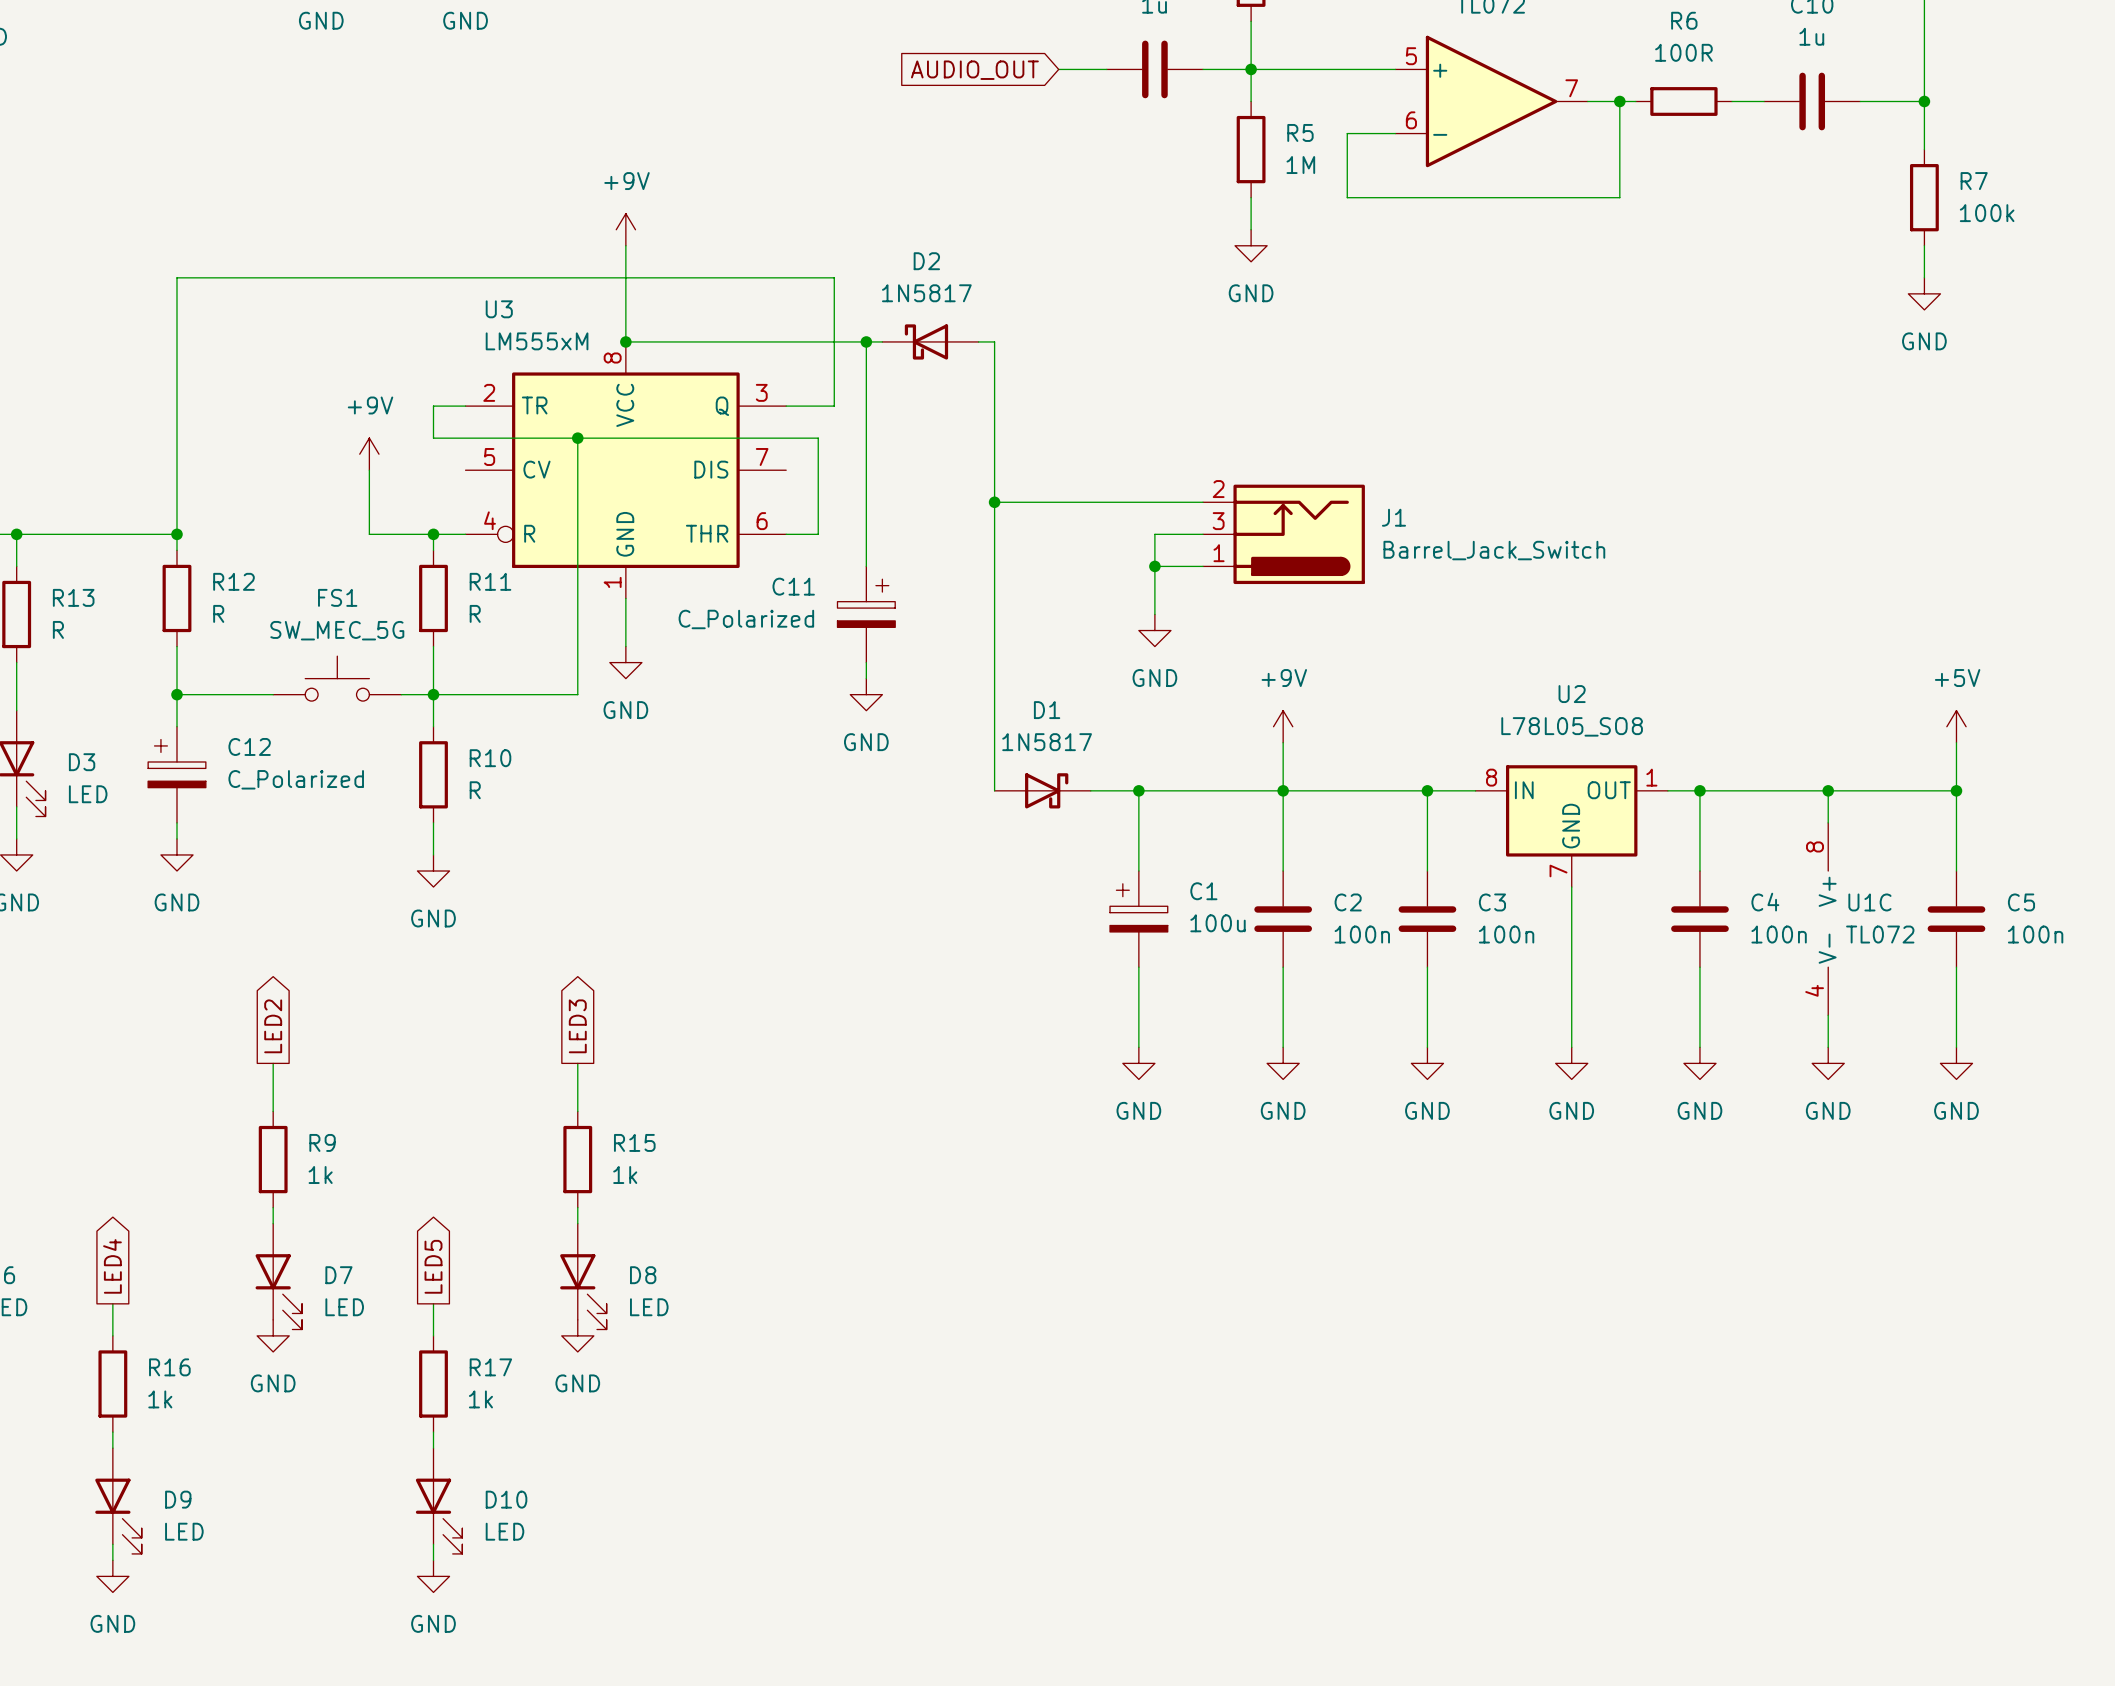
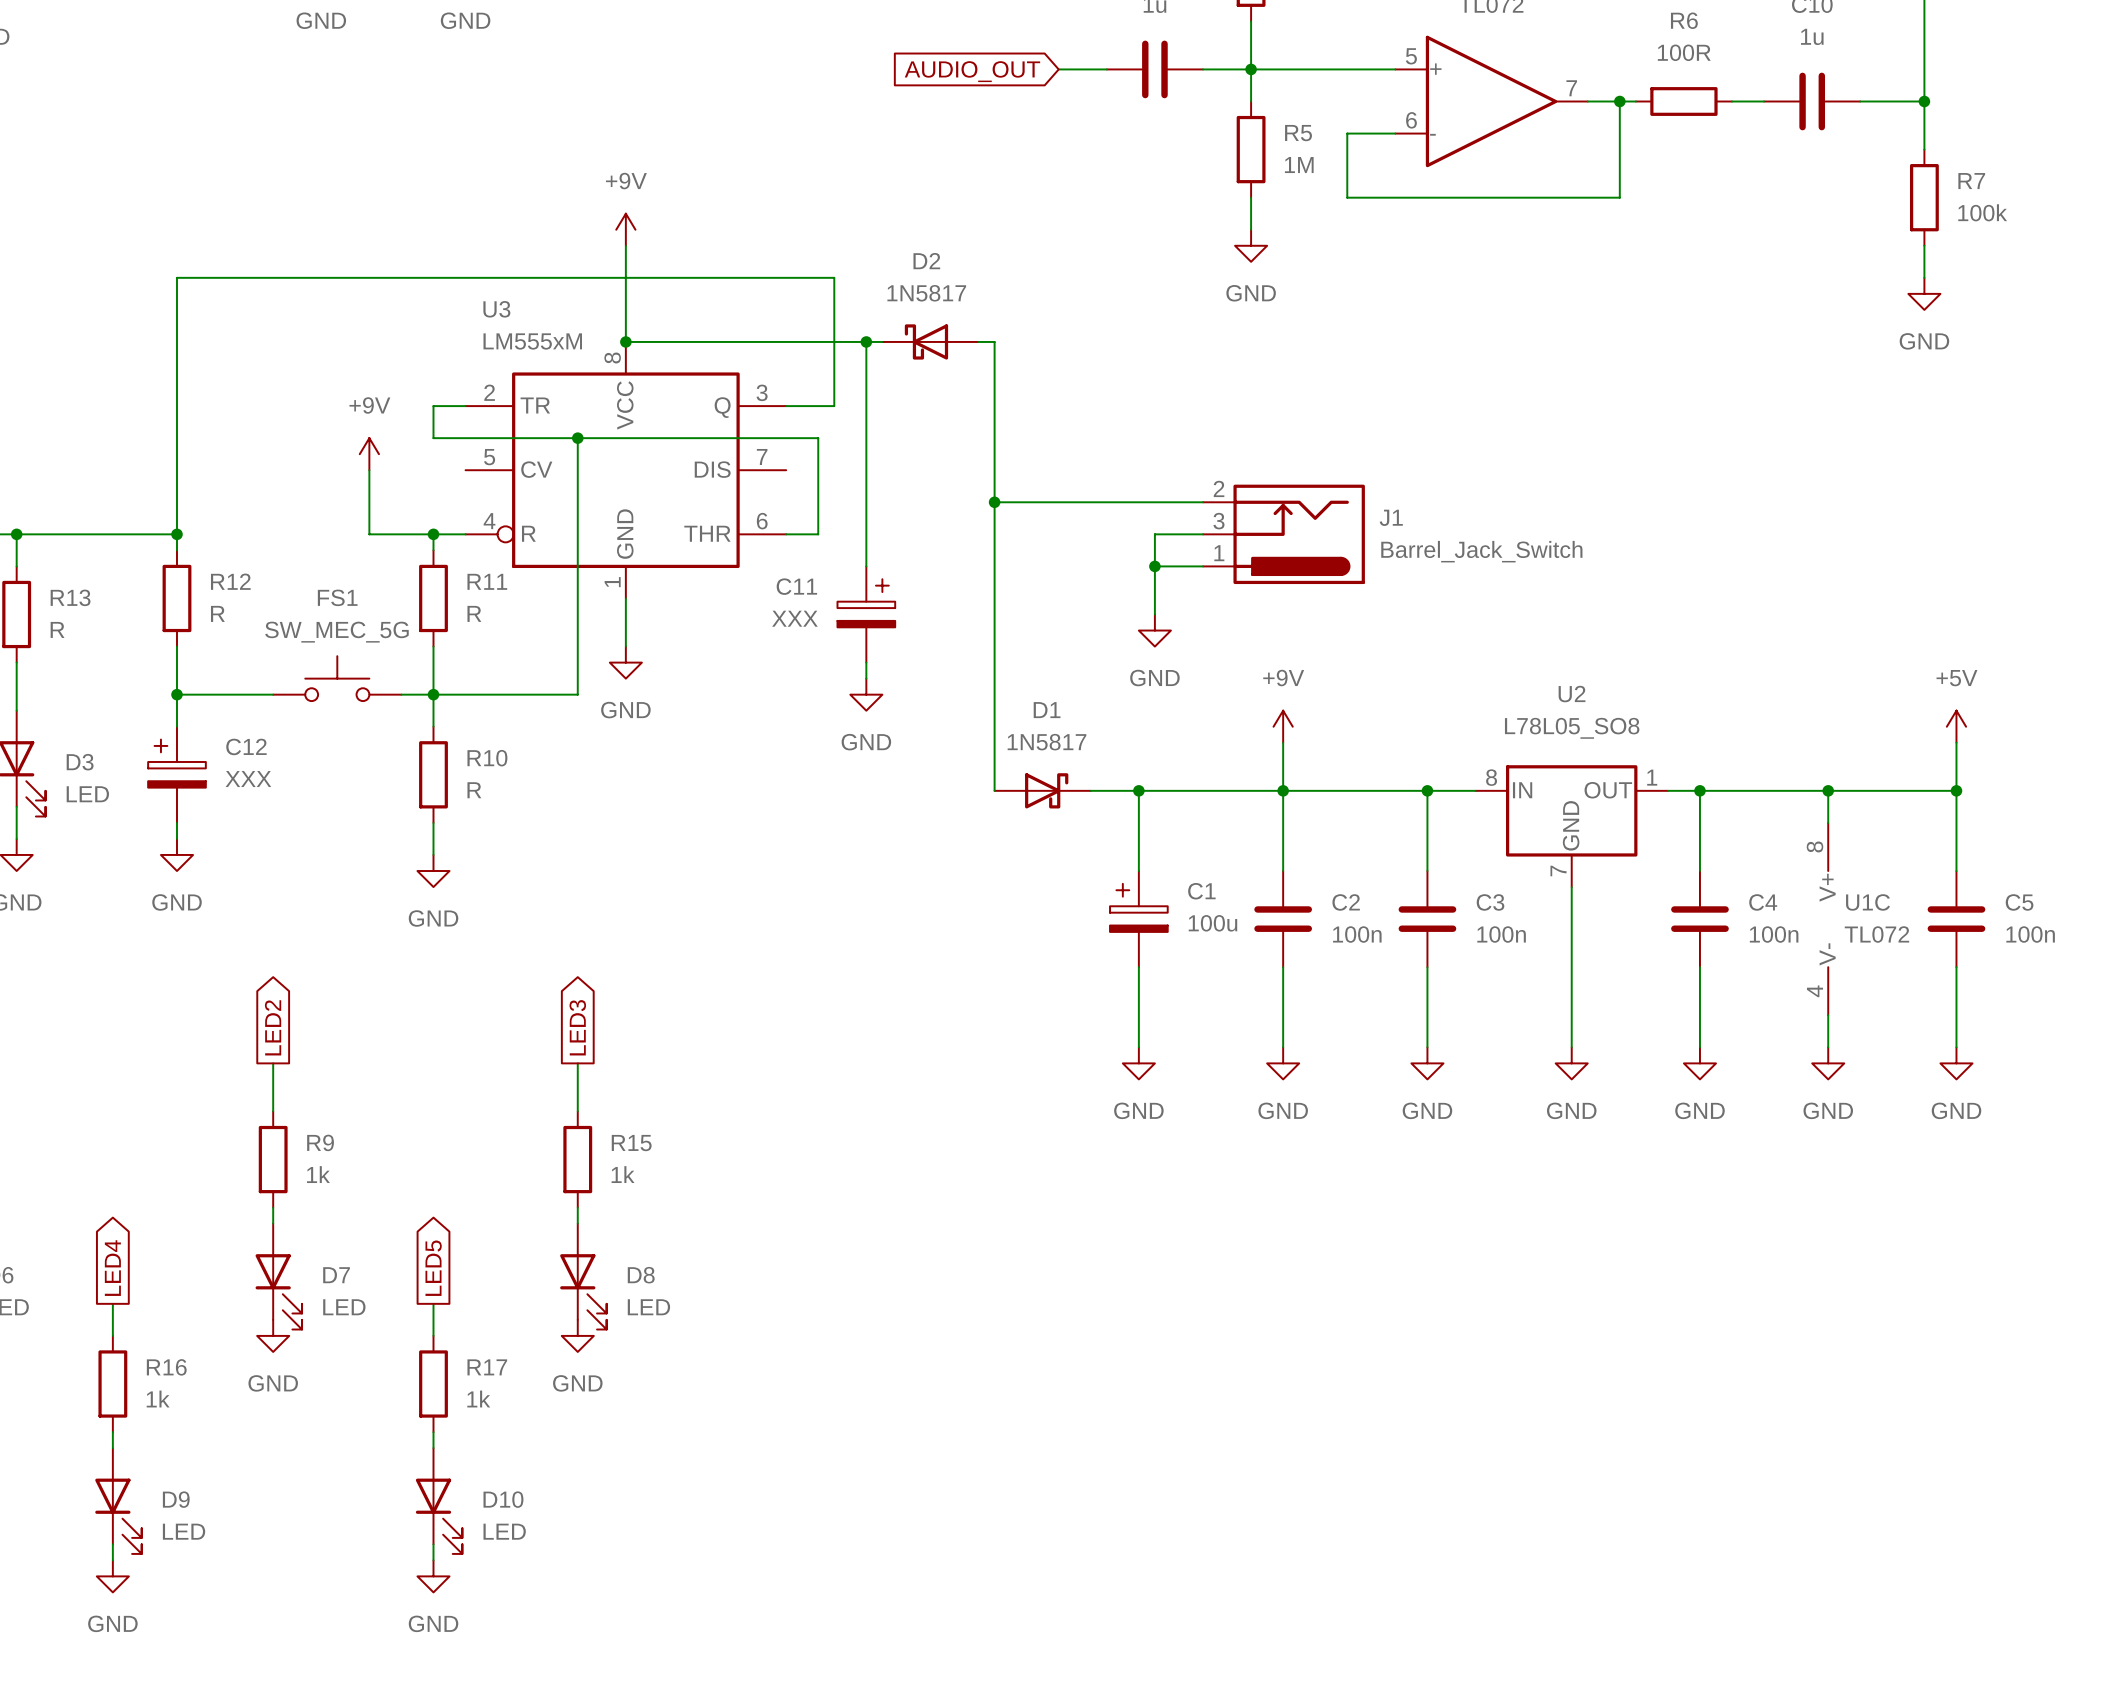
C11 value: C_Polarized (746, 619) -> XXX (794, 618)
C12 value: C_Polarized (296, 779) -> XXX (248, 779)

